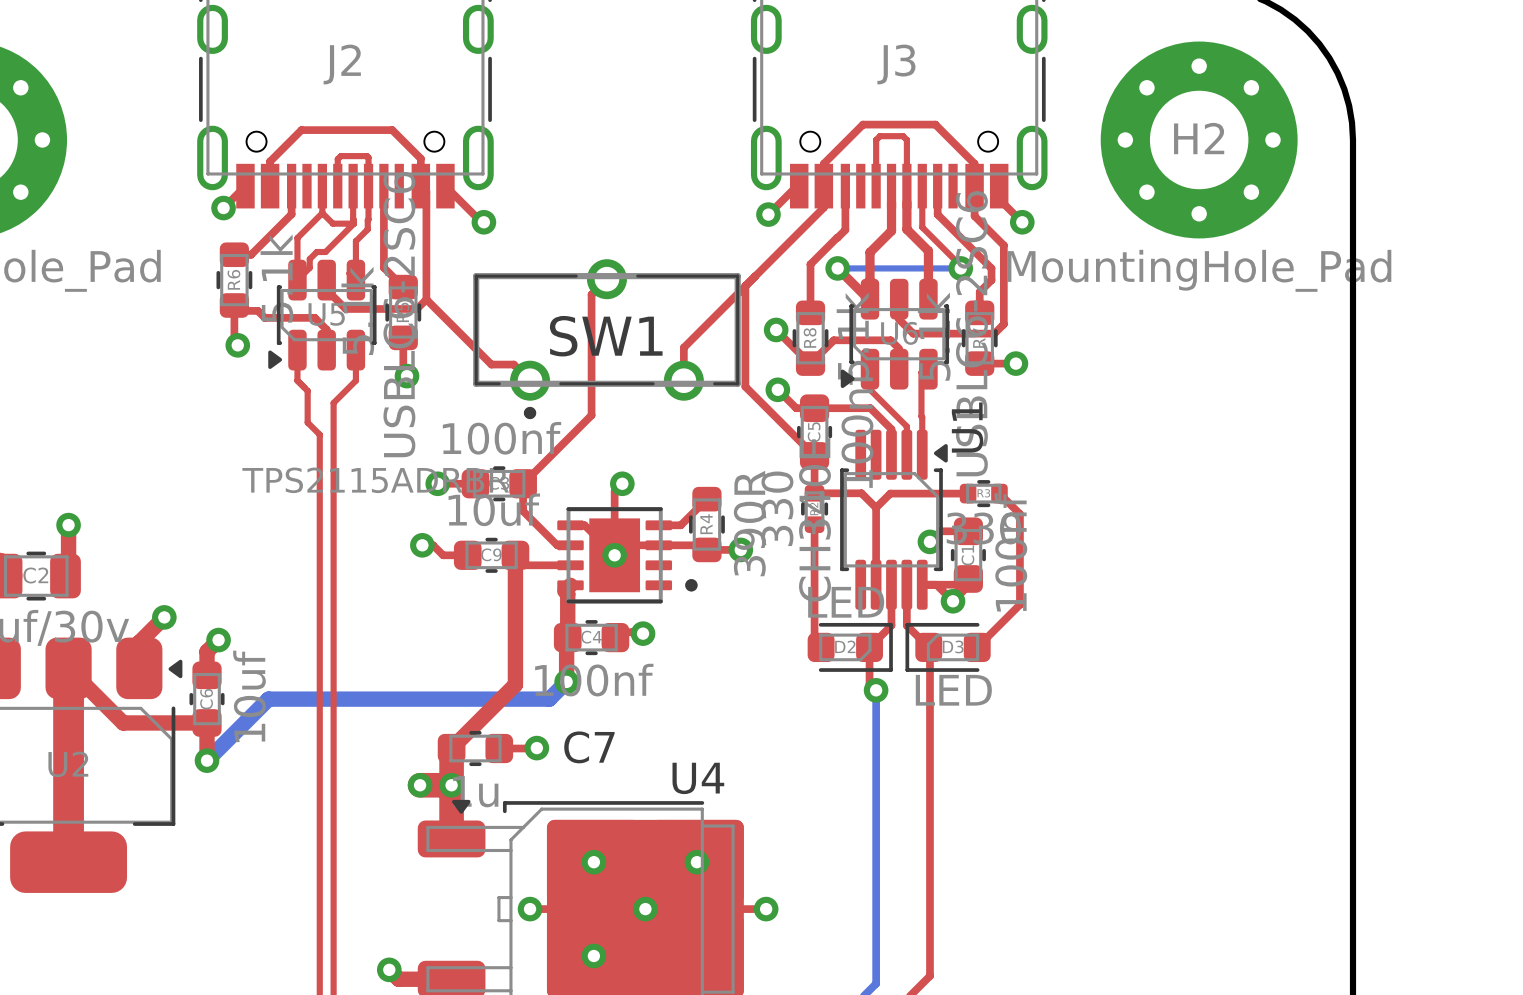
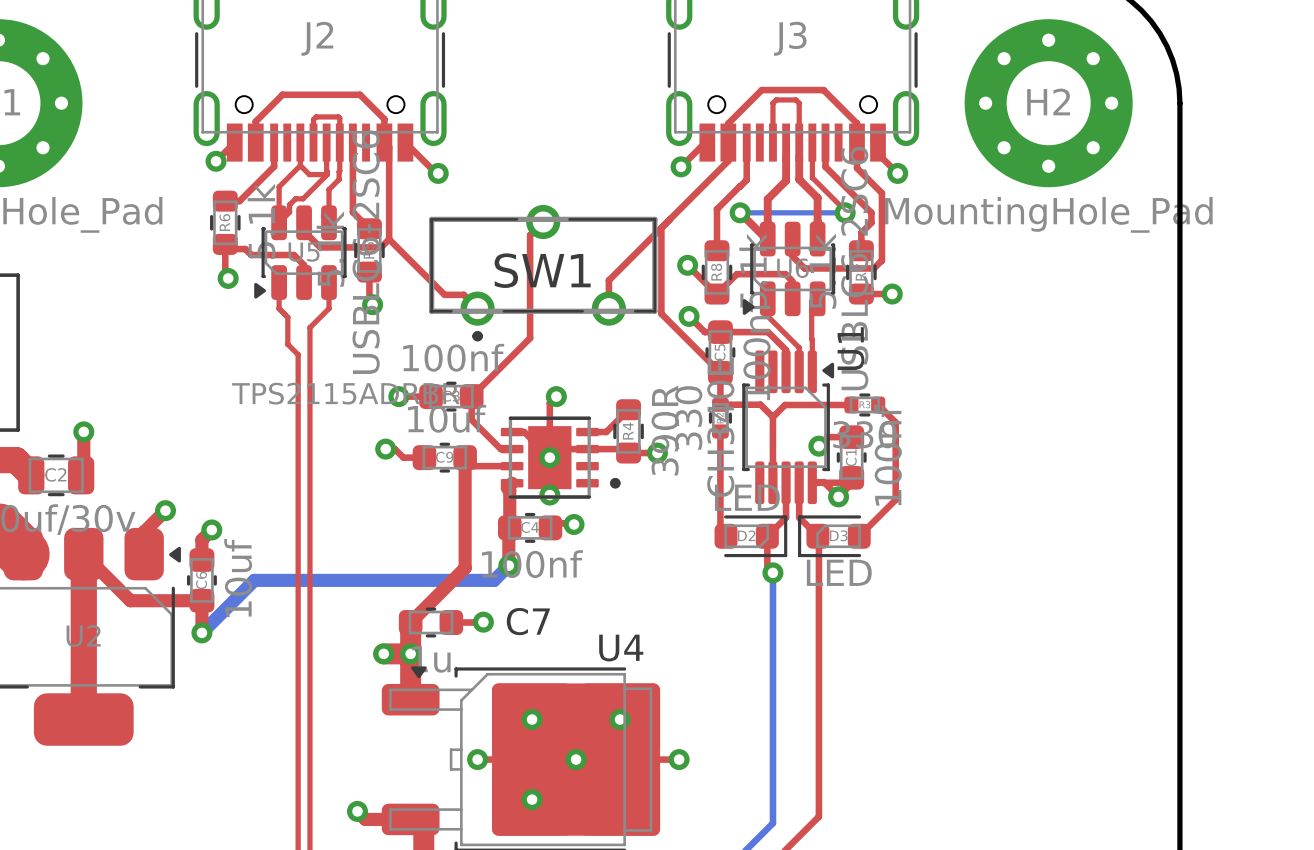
via: none -> (549, 495)

